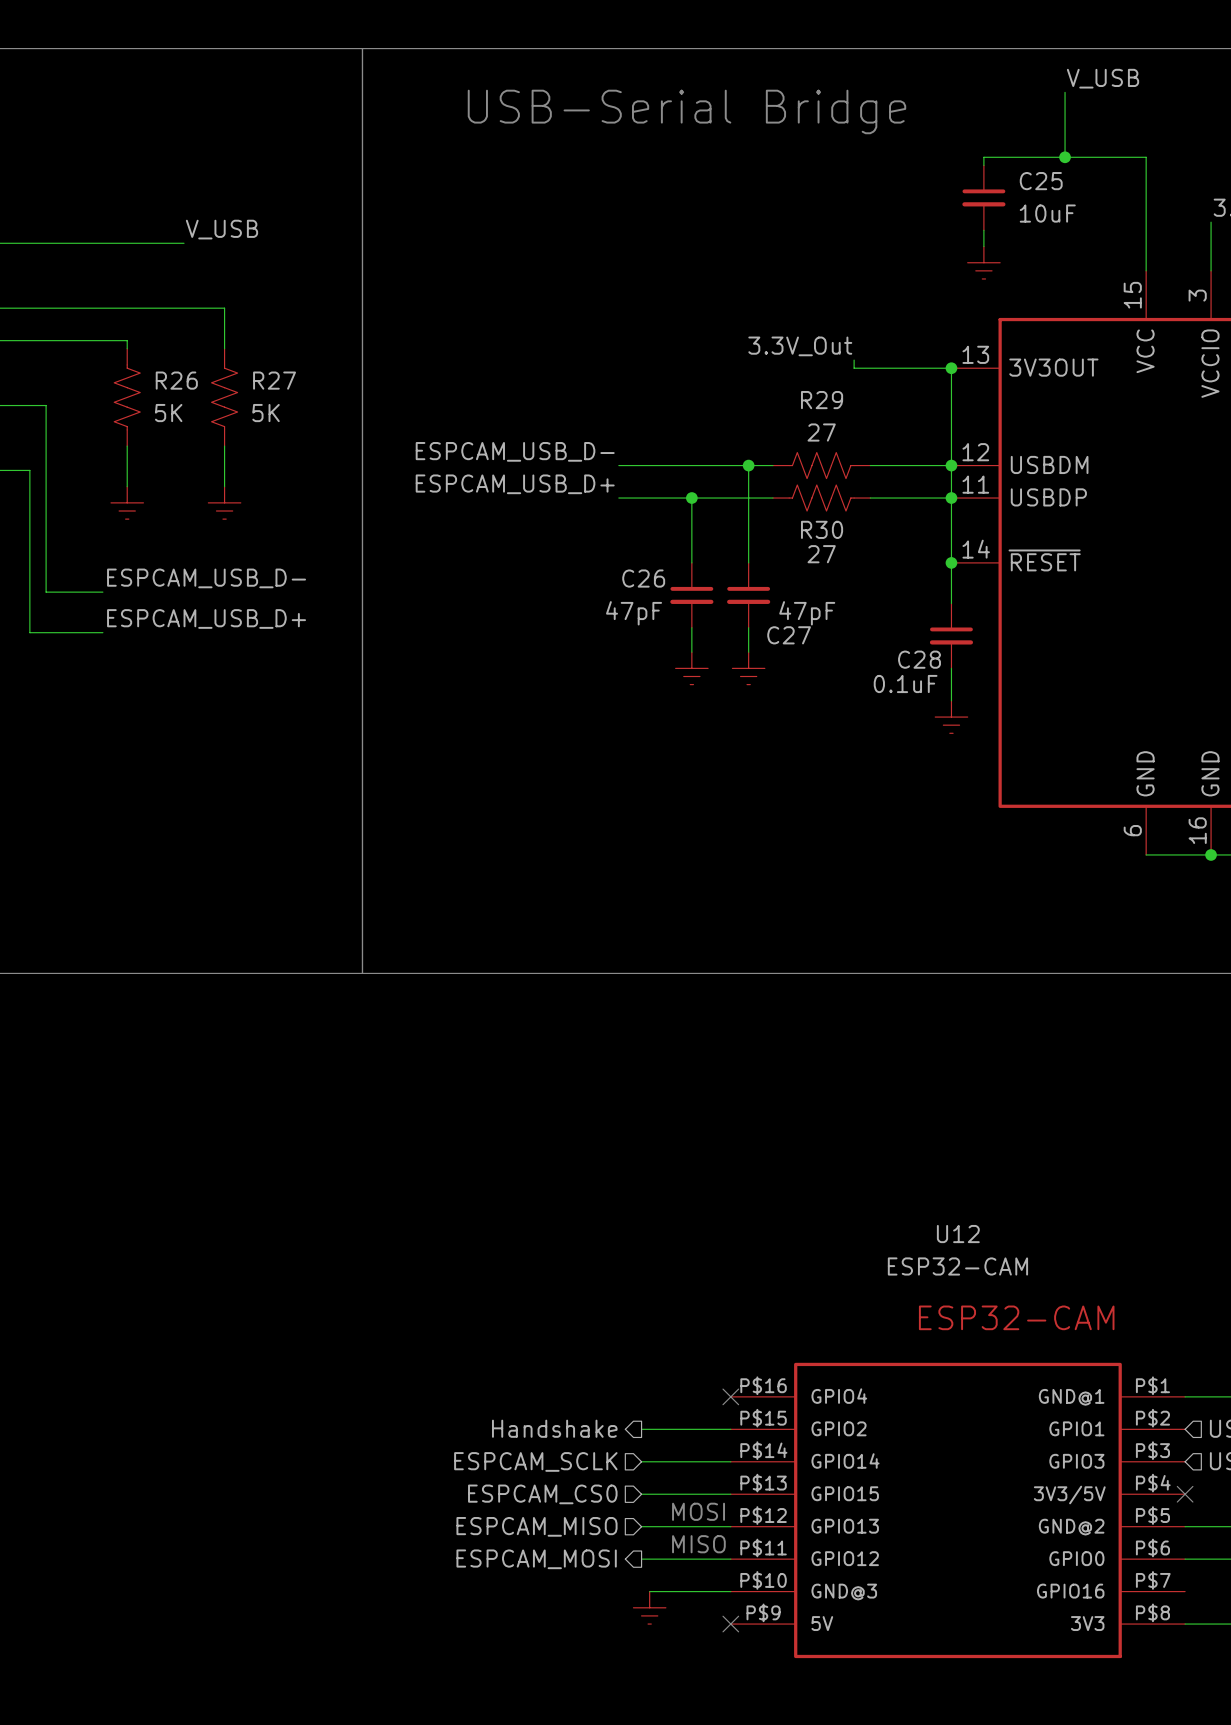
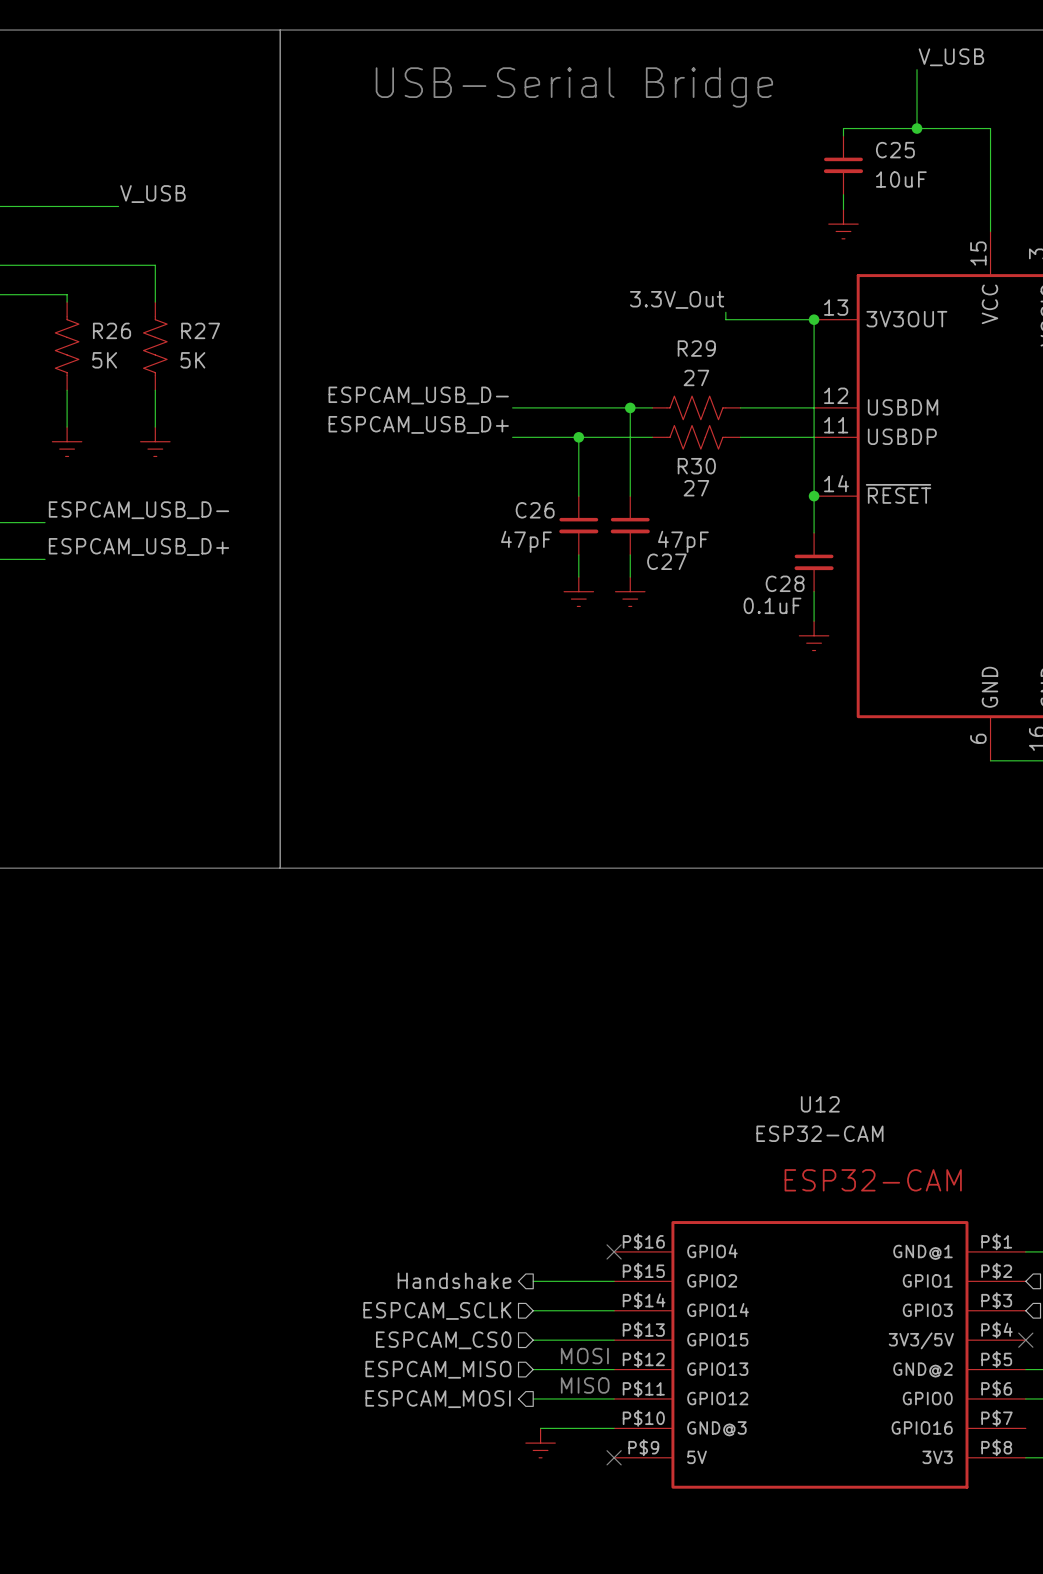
junction: (951, 465) -> none
junction: (951, 498) -> none

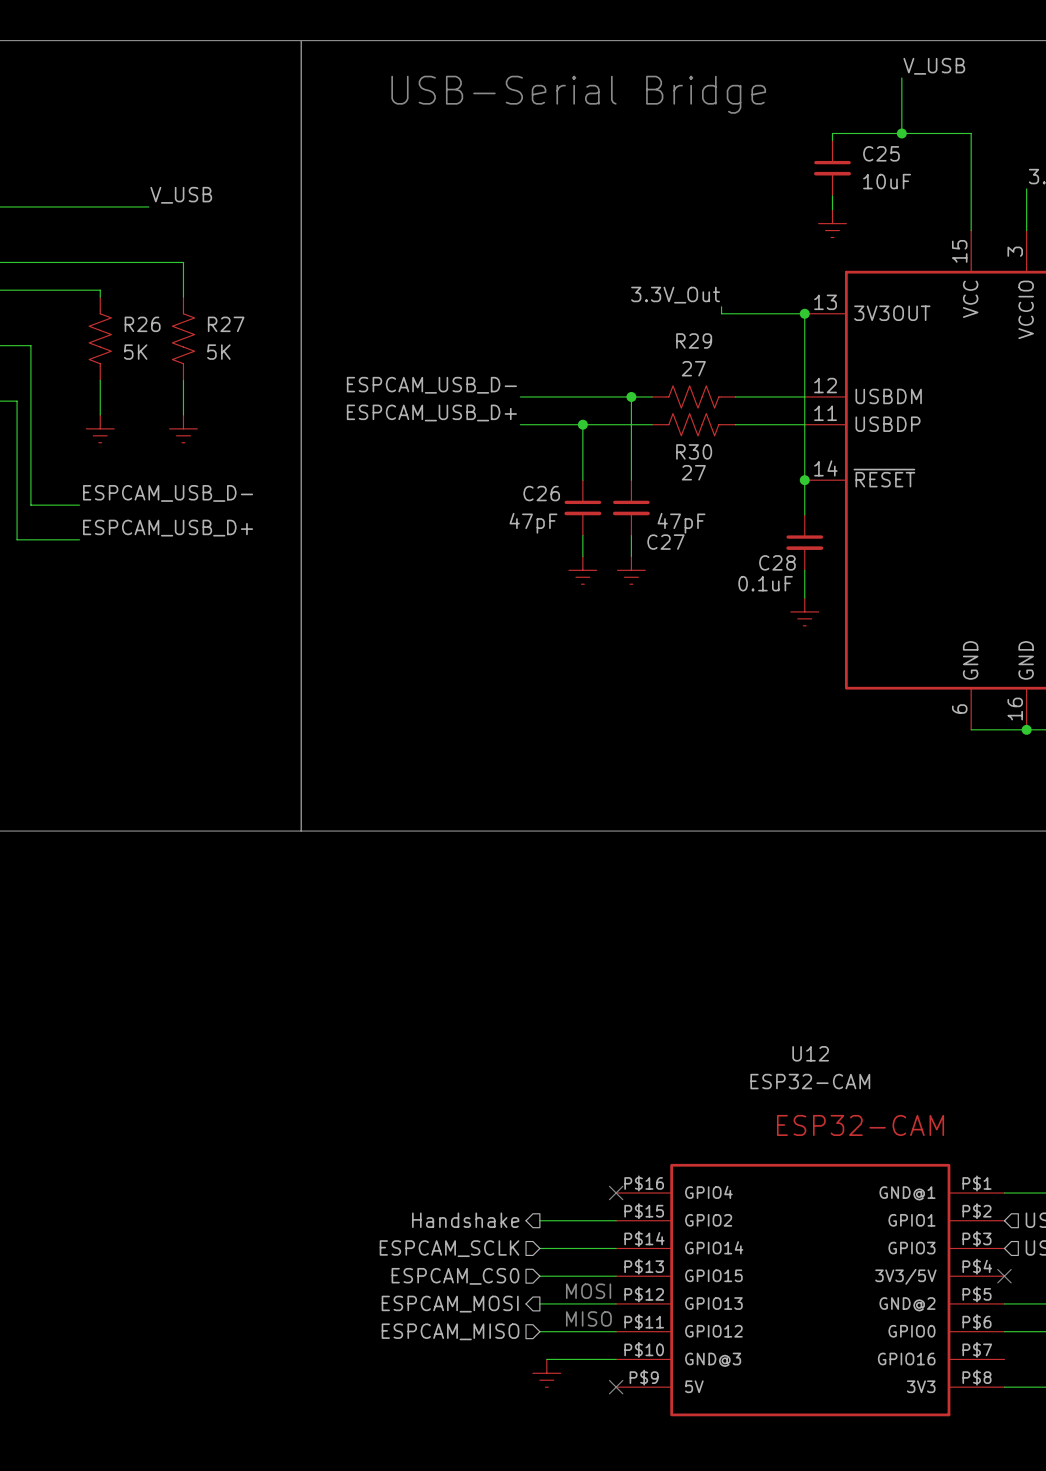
hierarchical label shape: input (438, 1369) -> output (450, 1304)
hierarchical label: ESPCAM_MISO (438, 1369) -> ESPCAM_MOSI (450, 1304)
hierarchical label shape: output (438, 1399) -> input (450, 1331)
hierarchical label: ESPCAM_MOSI (438, 1399) -> ESPCAM_MISO (450, 1331)

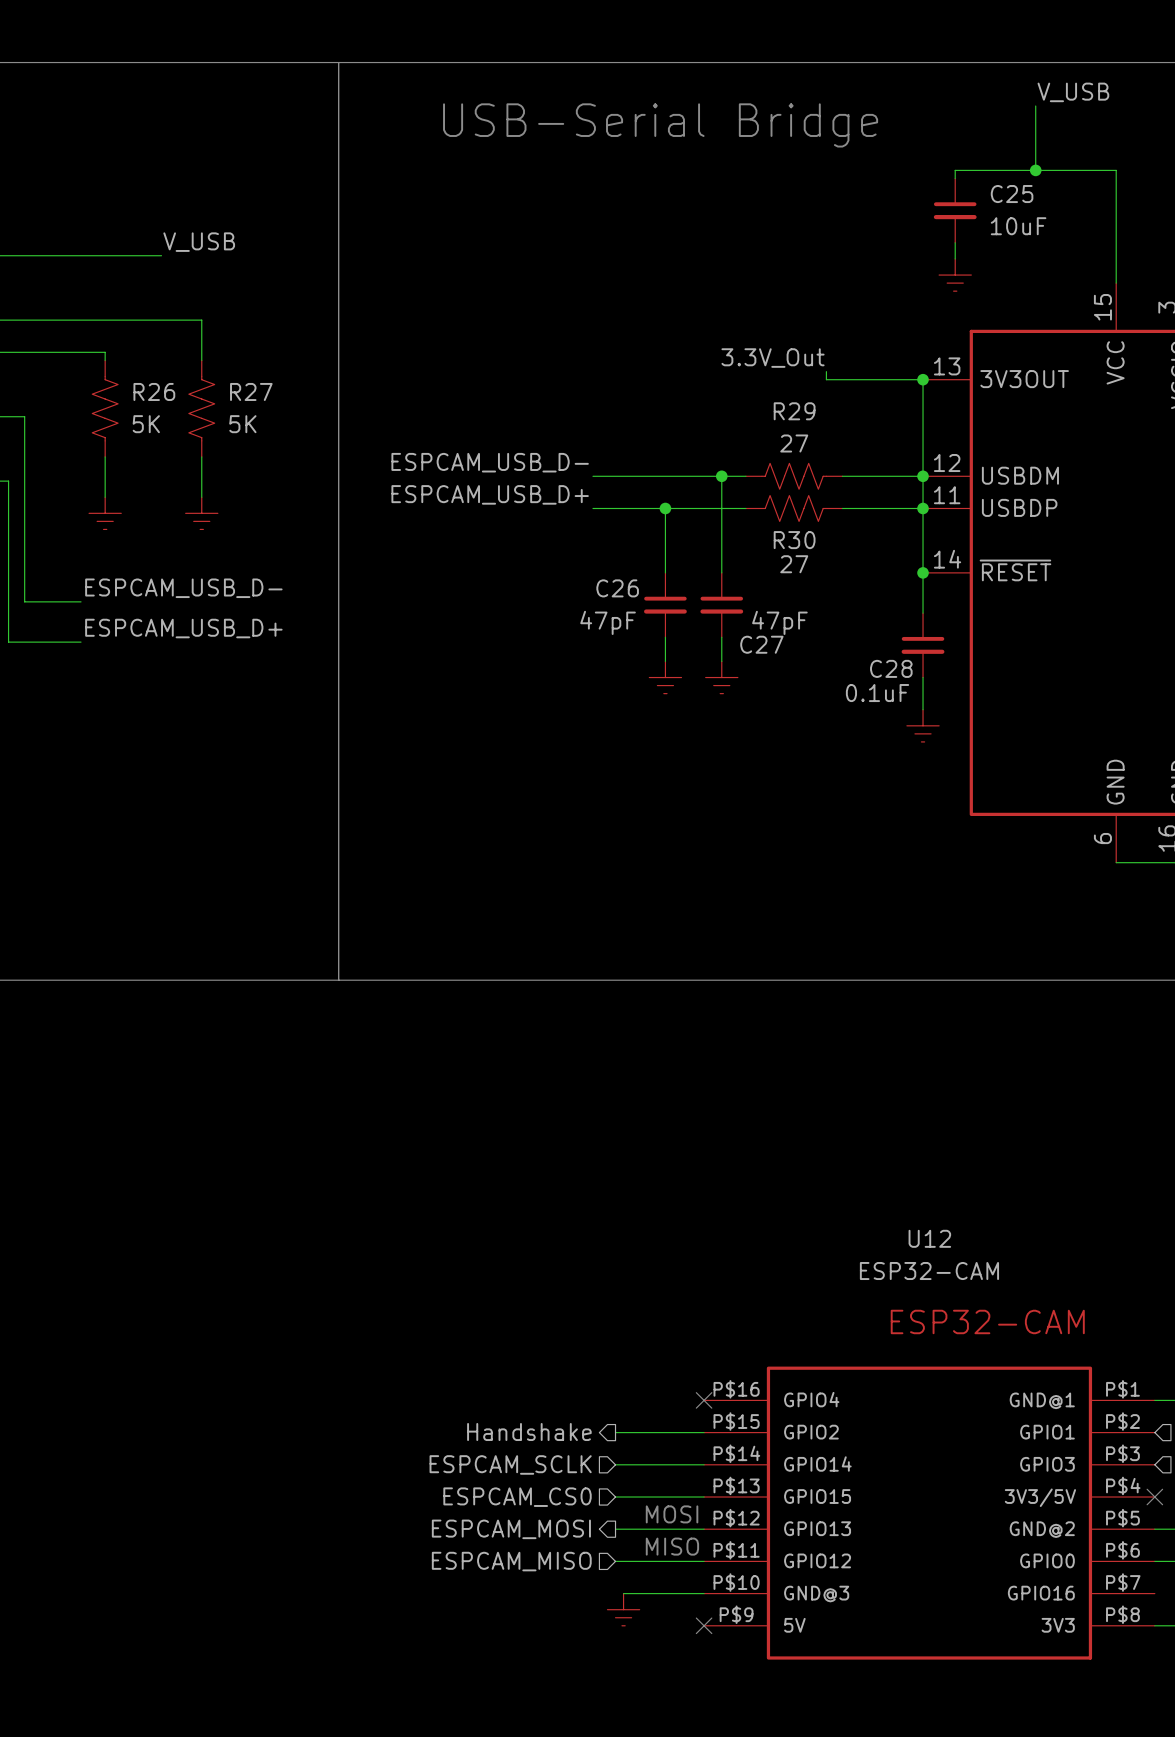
junction: none -> (923, 476)
junction: none -> (923, 508)

